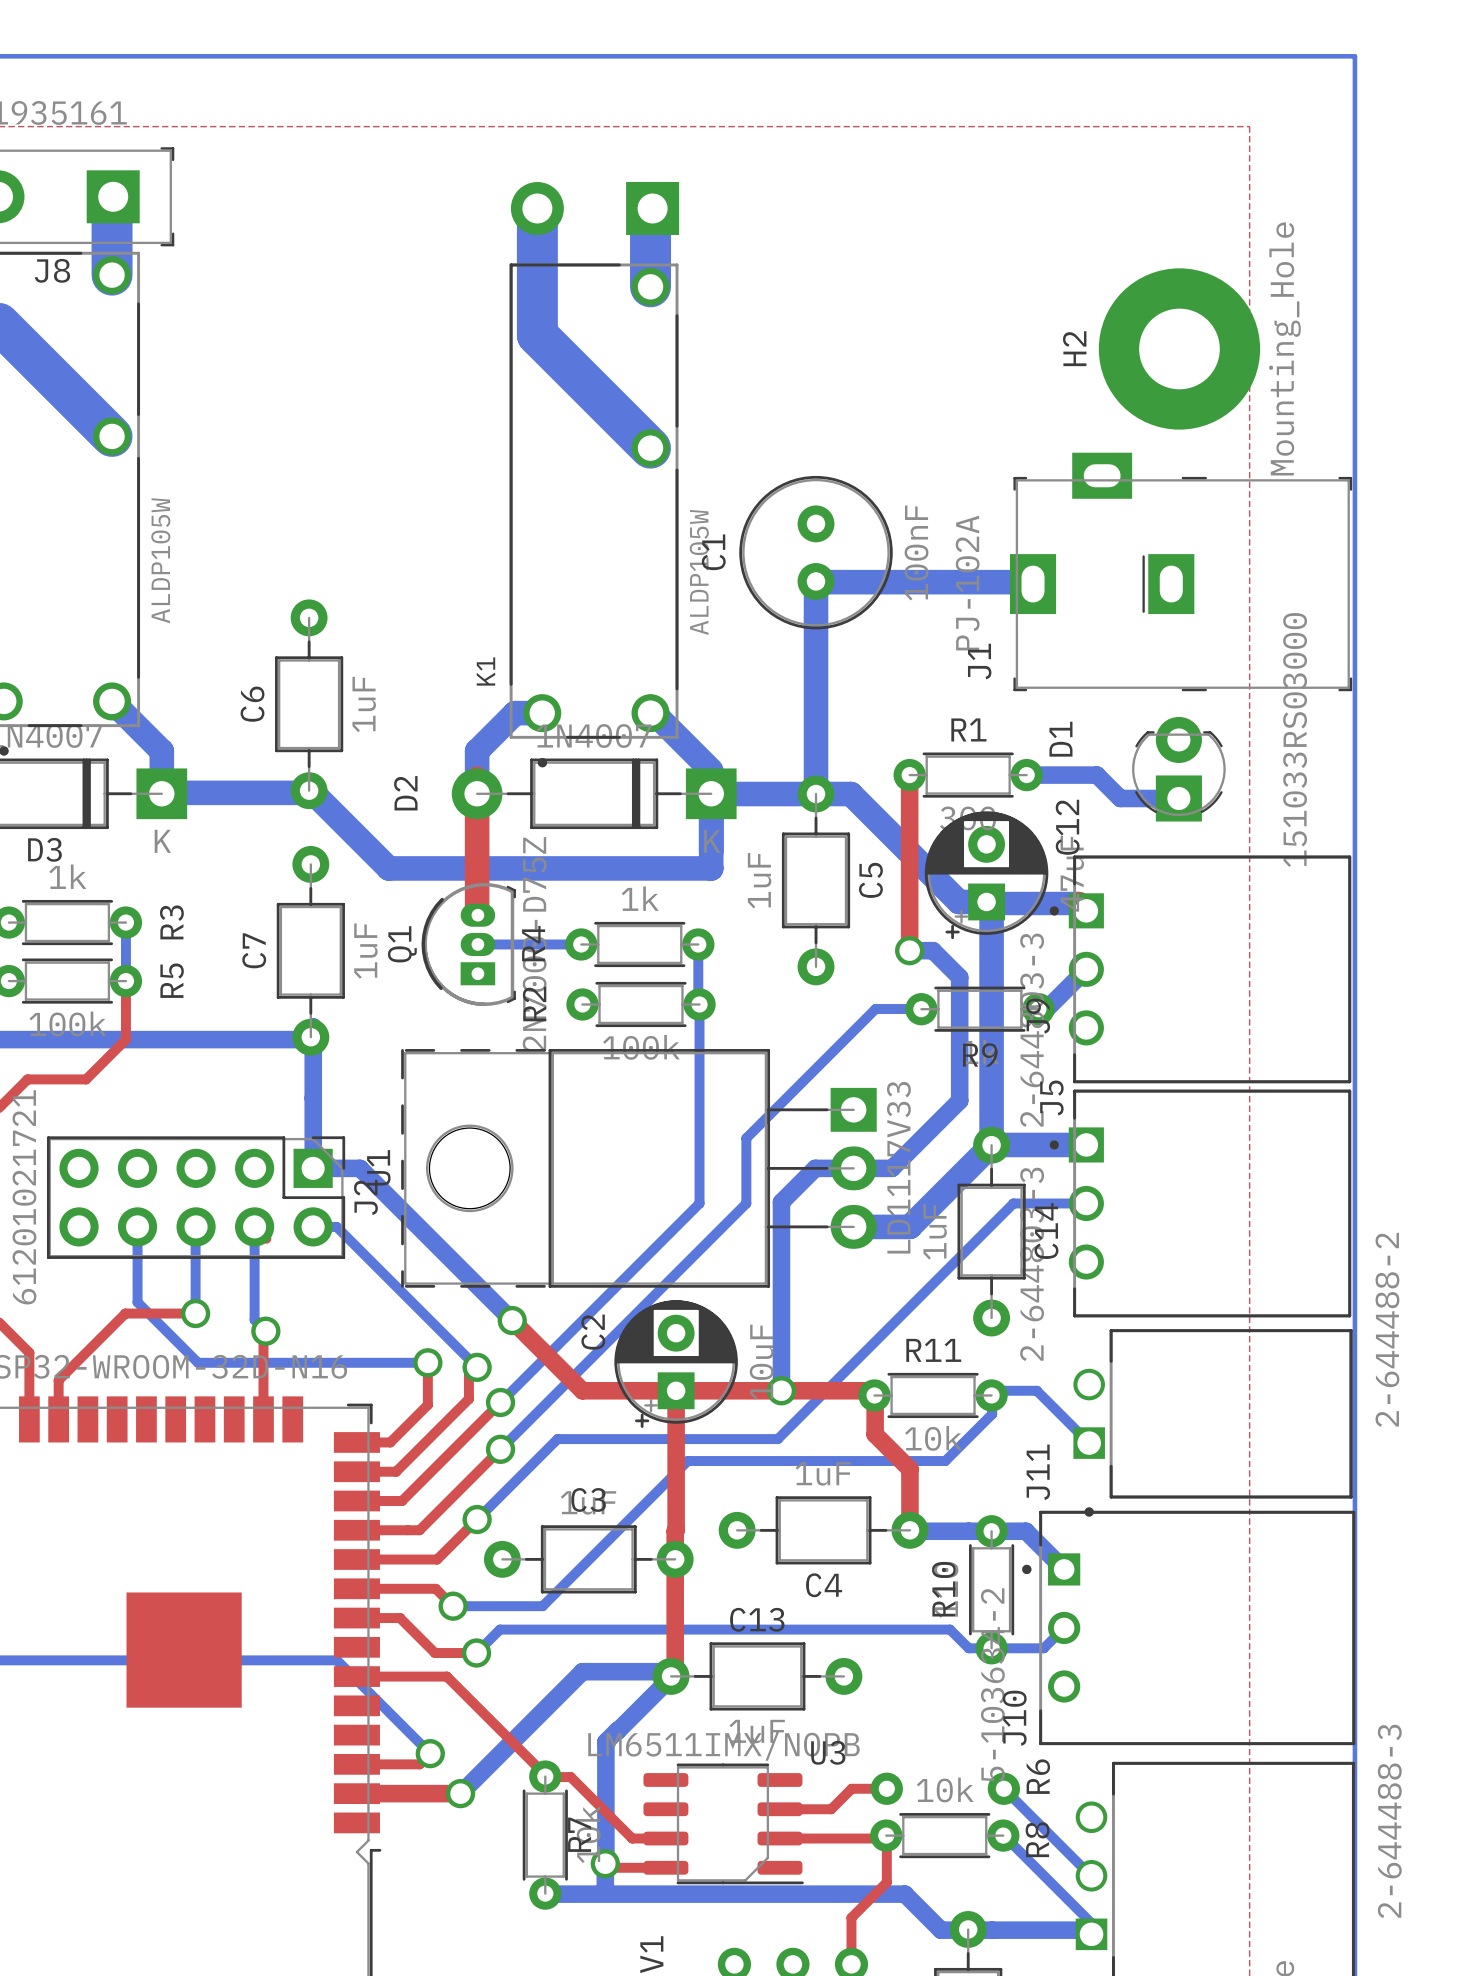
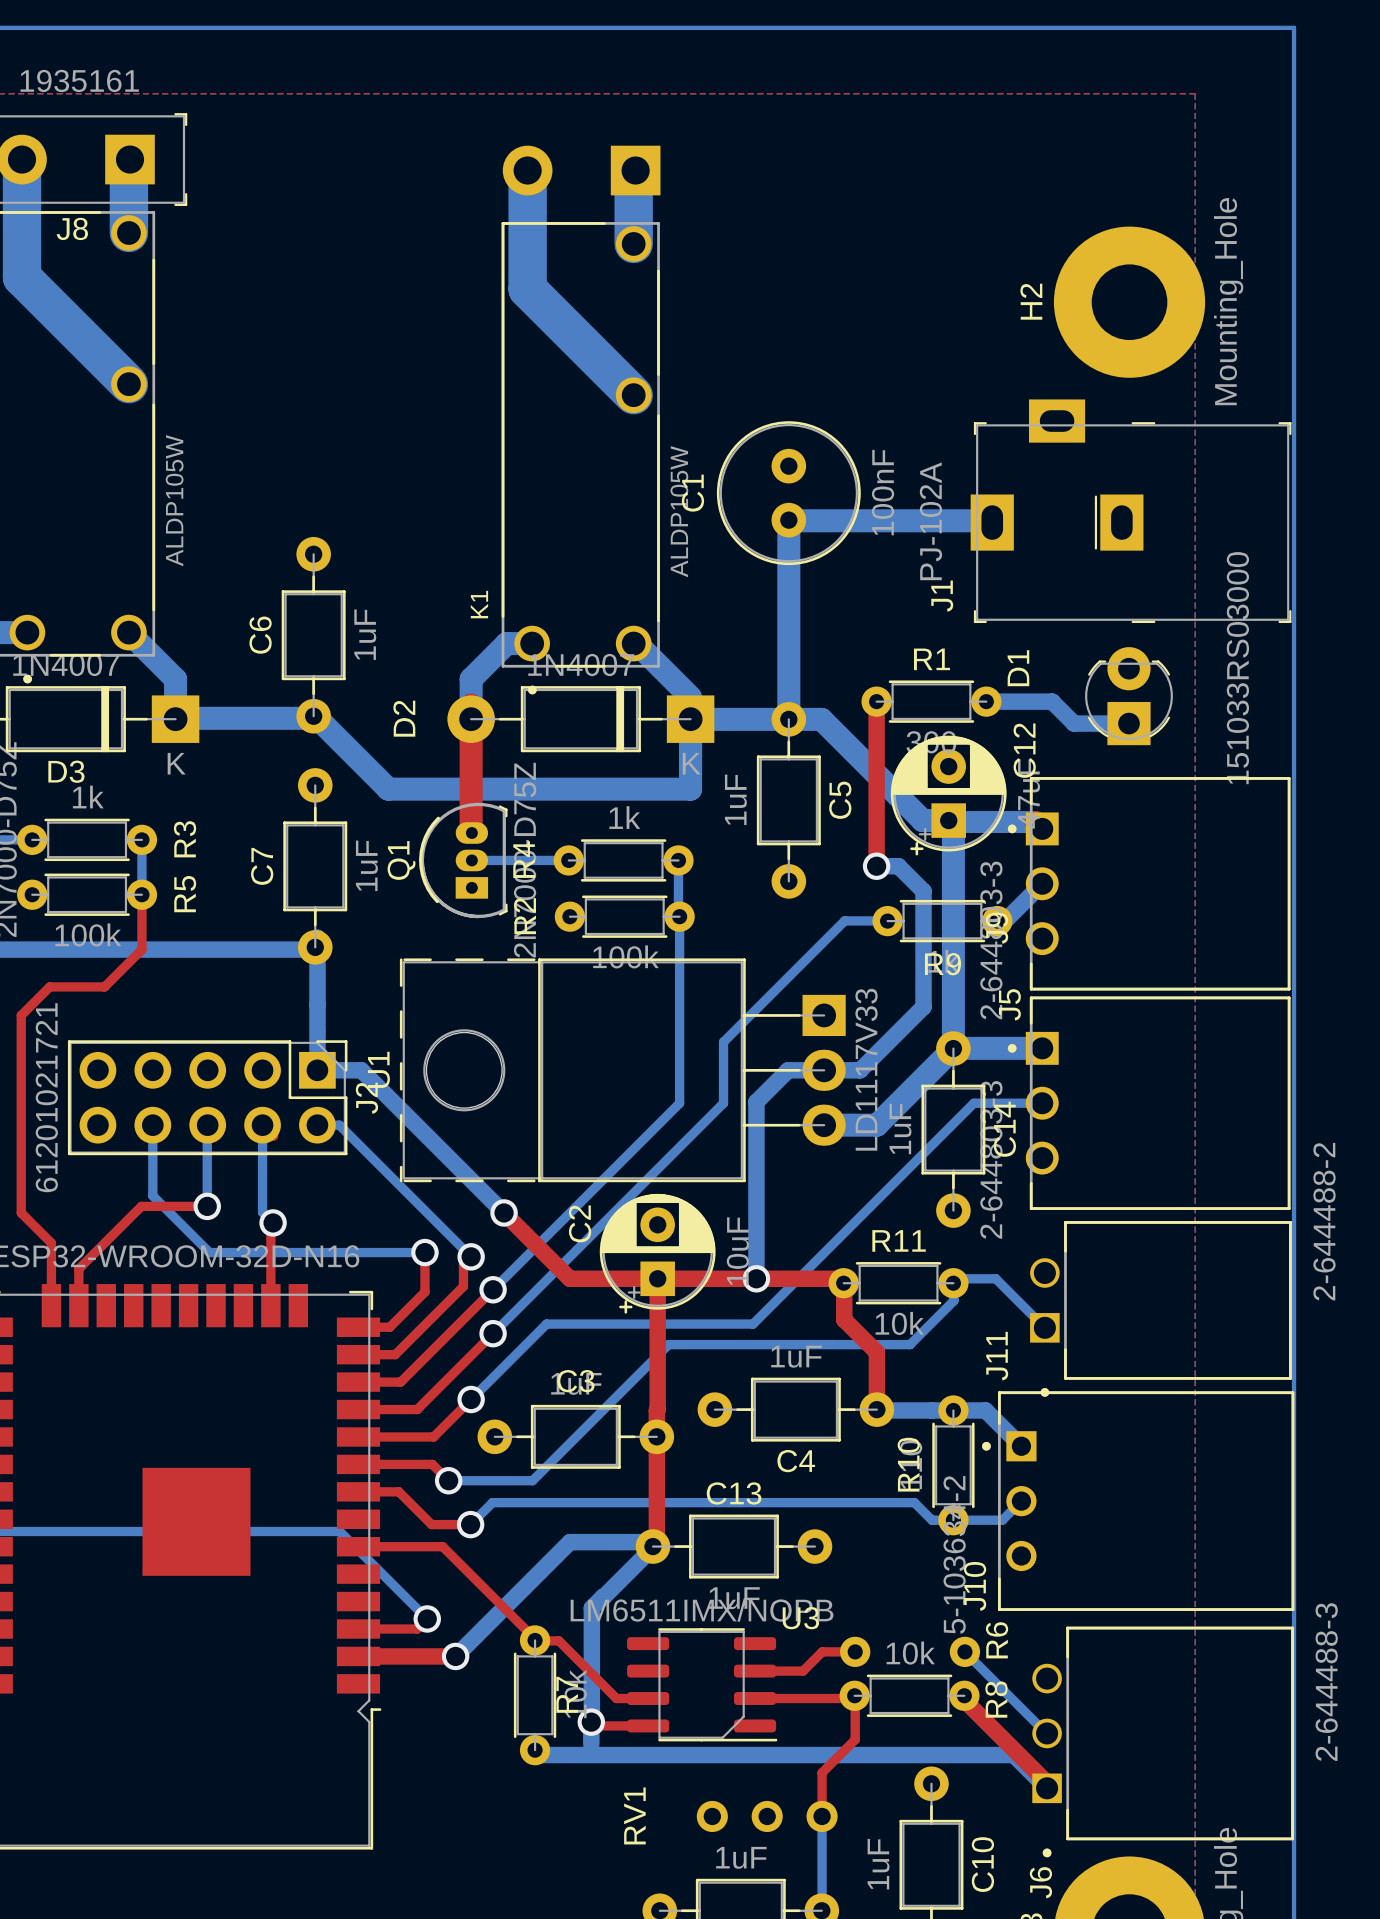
bottom track: (1003, 1835) (1091, 1923) -> none
top track: none -> (964, 1695) (964, 1700) (1047, 1782) (1047, 1788) (1047, 1778)
bottom track: (547, 1894) (904, 1894) (940, 1930) (1087, 1930) -> (536, 1750) (541, 1755) (1013, 1755) (1043, 1784)

